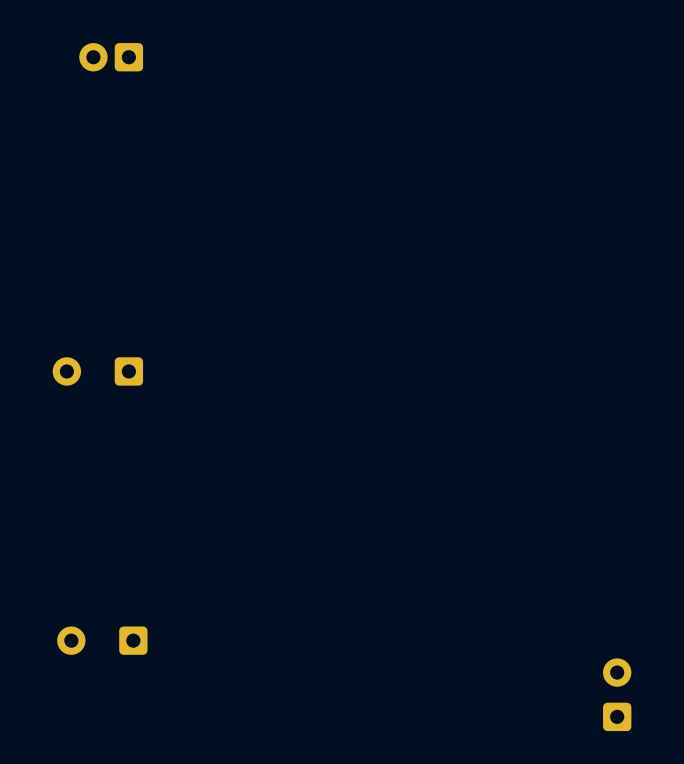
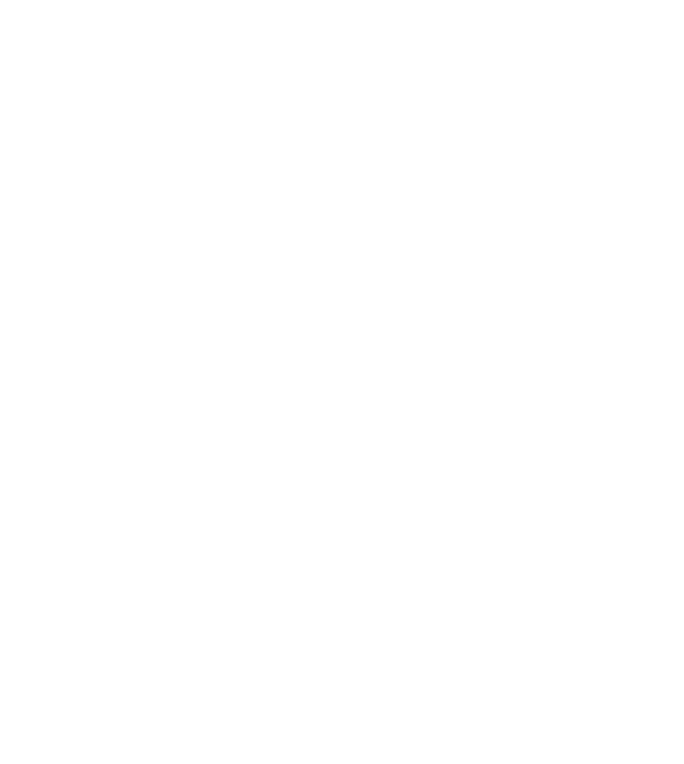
part: (111, 57) -> none
part: (97, 371) -> none
part: (102, 640) -> none
part: (617, 694) -> none

